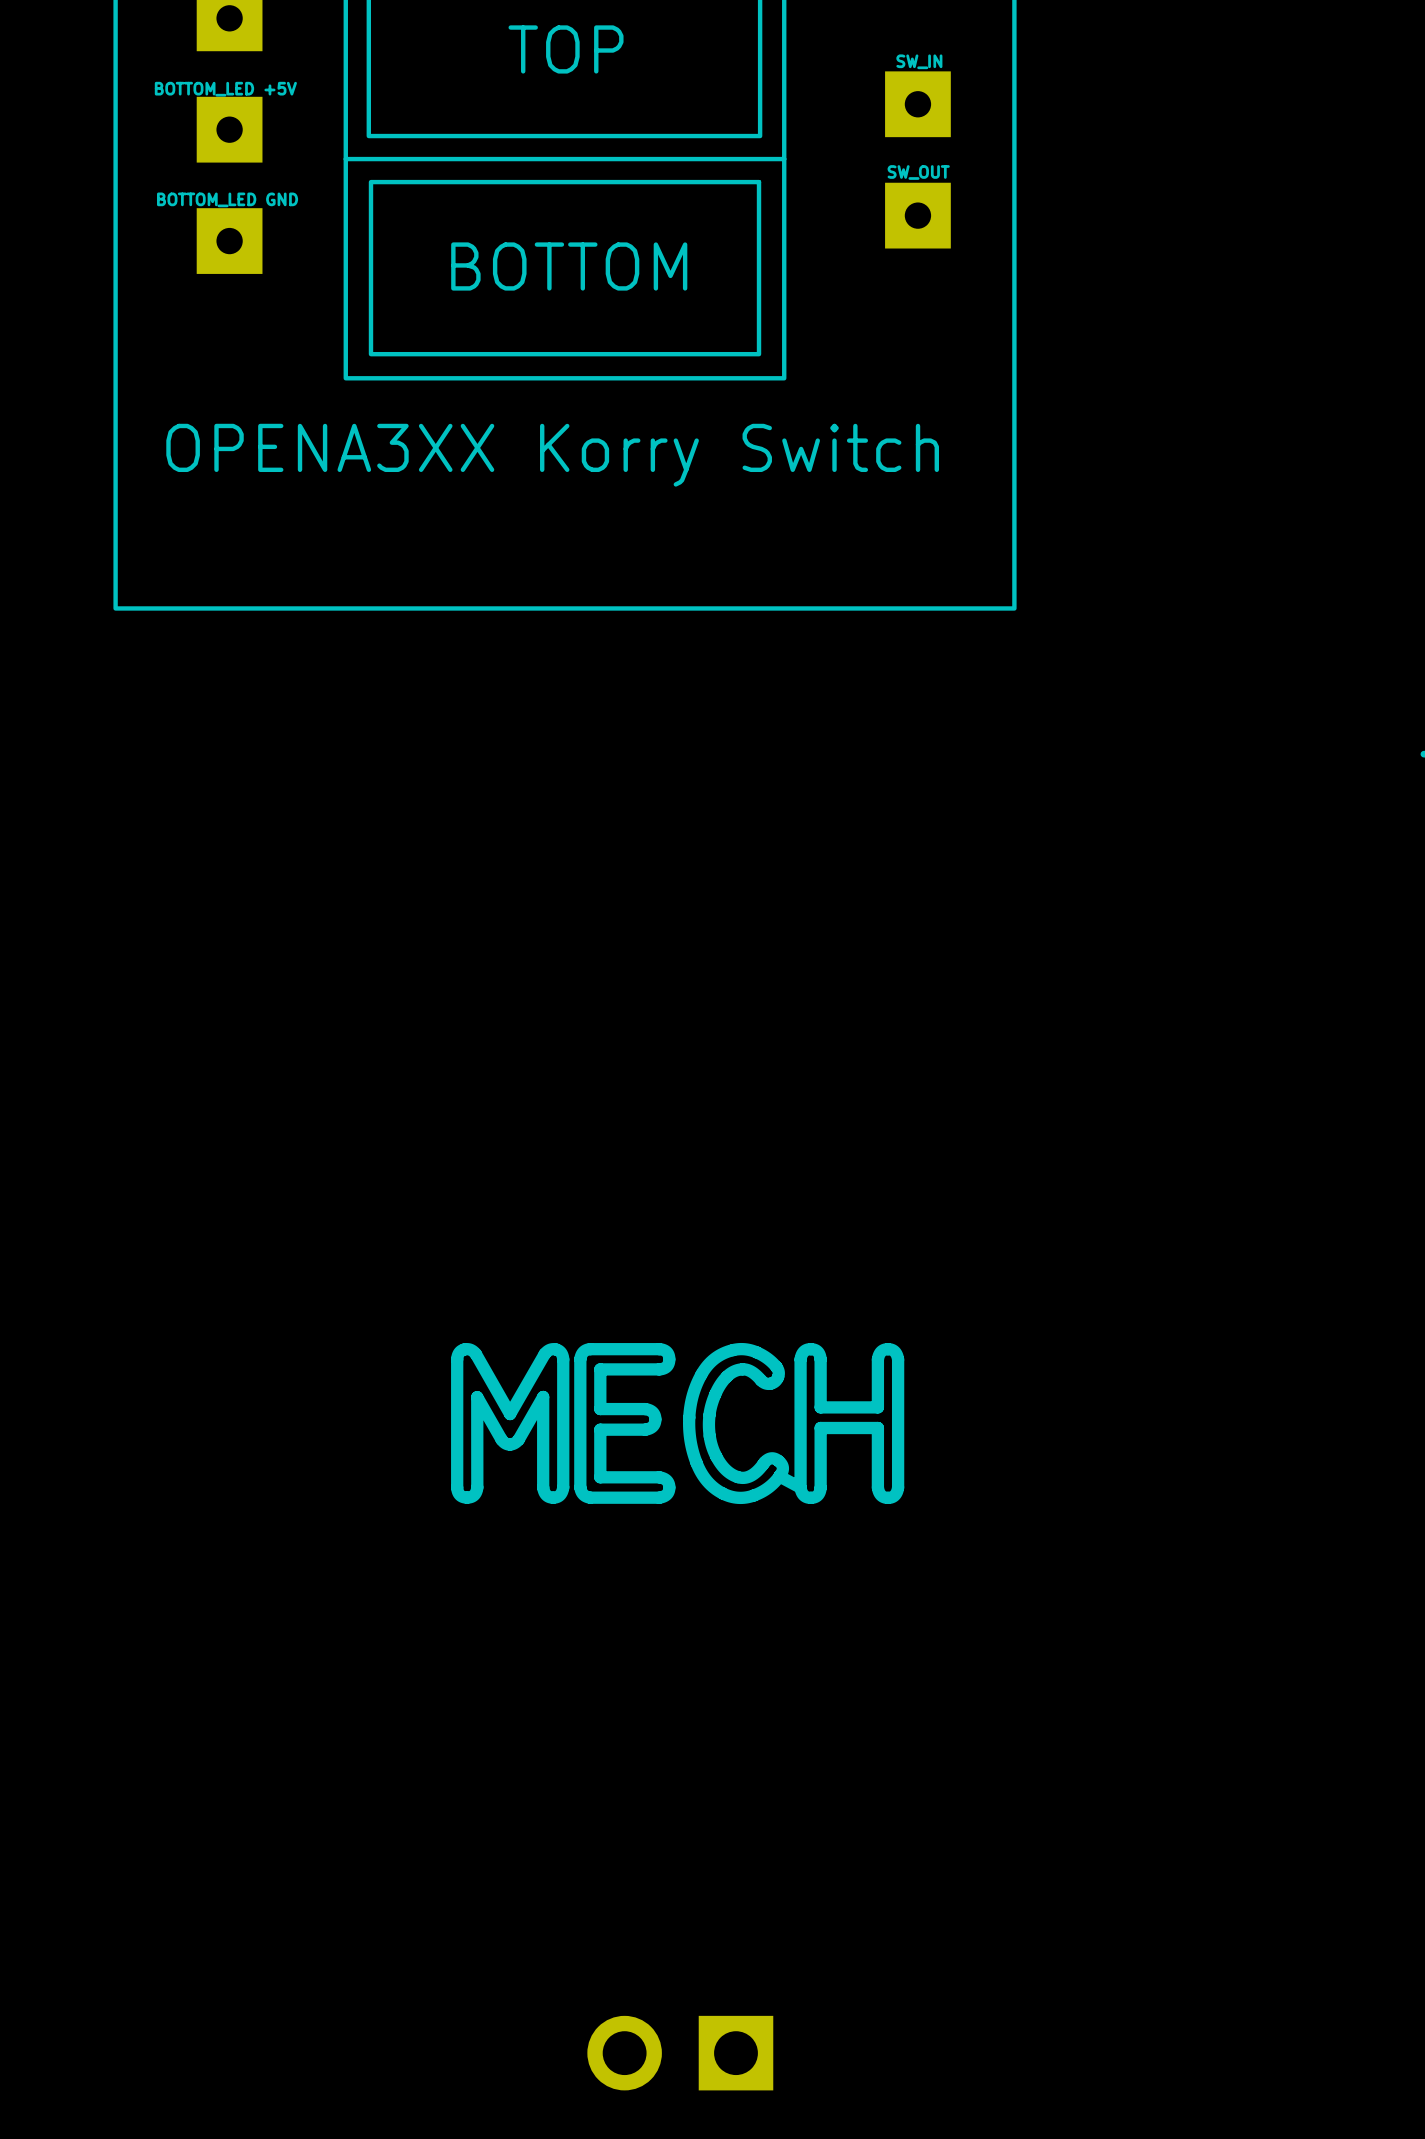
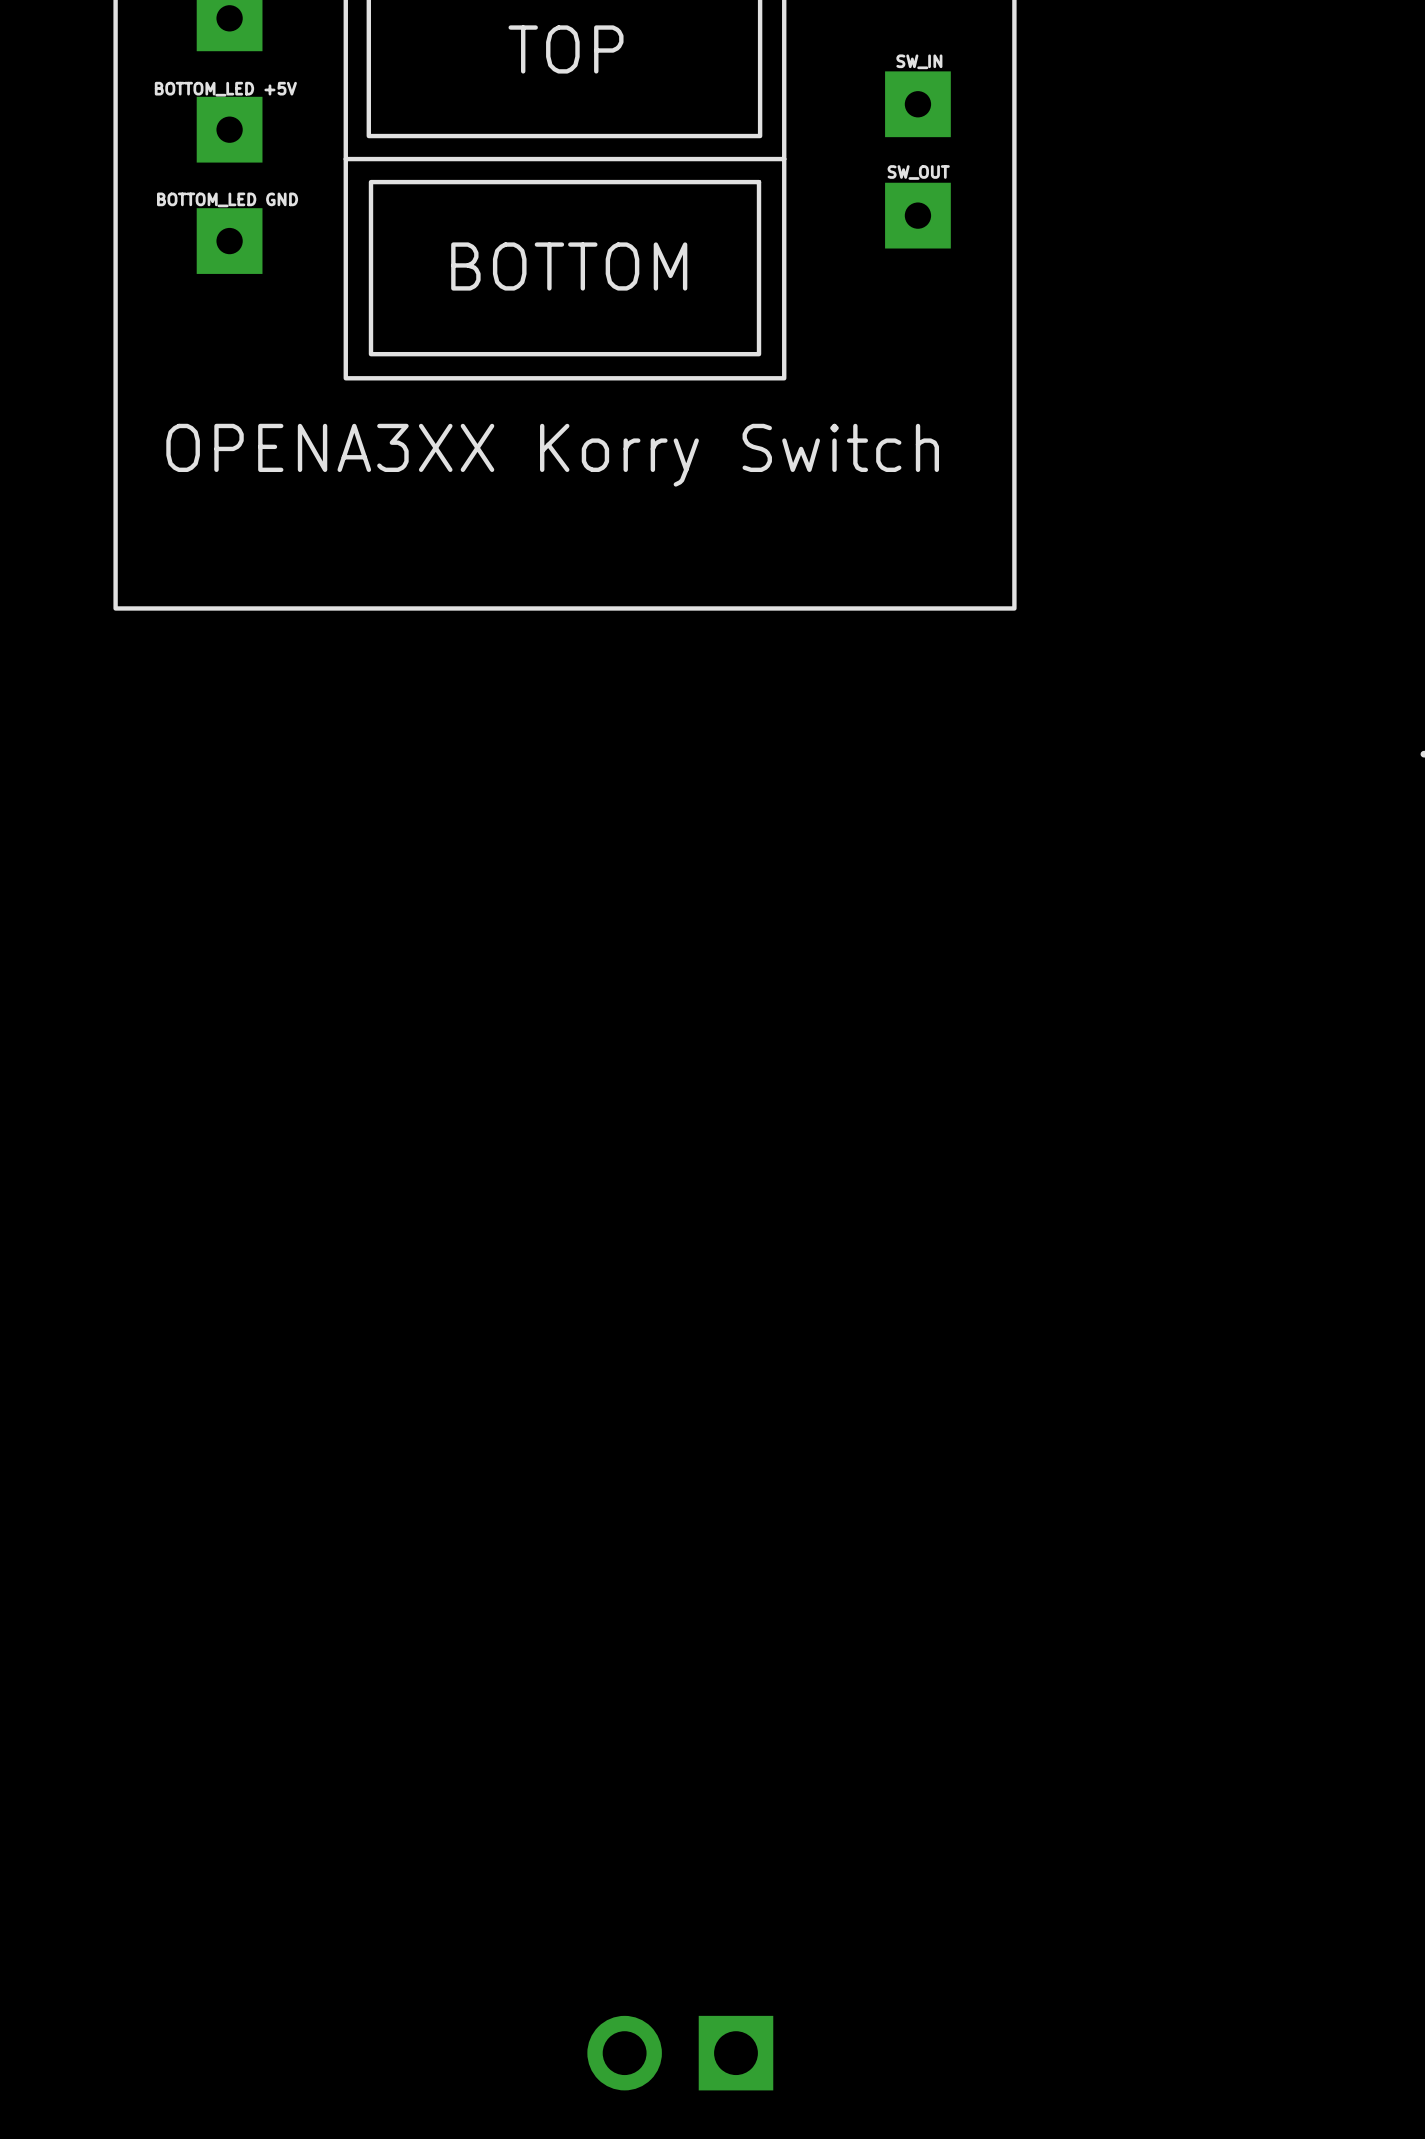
line: (556, 1349) (549, 1349) (544, 1354) (510, 1414) (475, 1353) (466, 1349) (458, 1353) (457, 1359) (457, 1487) (461, 1496) (471, 1496) (477, 1488) (477, 1397) (501, 1439) (509, 1444) (518, 1439) (543, 1396) (543, 1488) (545, 1494) (550, 1497) (557, 1497) (561, 1493) (563, 1487) (563, 1359) (561, 1352) (556, 1349) -> none
line: (659, 1349) (590, 1349) (581, 1354) (580, 1359) (580, 1487) (582, 1493) (586, 1496) (659, 1497) (668, 1492) (668, 1482) (660, 1477) (600, 1477) (600, 1429) (646, 1429) (653, 1425) (655, 1419) (653, 1413) (646, 1409) (600, 1409) (600, 1369) (663, 1368) (668, 1364) (668, 1356) (665, 1350) (659, 1349) -> none
line: (776, 1367) (762, 1355) (745, 1349) (728, 1351) (712, 1360) (701, 1374) (692, 1397) (689, 1420) (690, 1443) (696, 1462) (704, 1477) (714, 1488) (726, 1495) (740, 1497) (753, 1495) (768, 1487) (779, 1476) (800, 1487) -> none
line: (776, 1367) (777, 1377) (769, 1383) (763, 1382) (753, 1373) (745, 1369) (737, 1370) (728, 1375) (720, 1384) (713, 1398) (708, 1426) (714, 1452) (721, 1465) (730, 1473) (739, 1477) (748, 1476) (756, 1471) (766, 1460) (772, 1458) (777, 1460) (782, 1465) (780, 1475) -> none
line: (800, 1487) (800, 1359) (802, 1353) (812, 1349) (819, 1355) (820, 1407) (877, 1407) (878, 1357) (884, 1349) (893, 1350) (898, 1359) (898, 1487) (895, 1493) (891, 1497) (885, 1497) (878, 1490) (877, 1428) (820, 1428) (819, 1492) (815, 1496) (807, 1497) (802, 1493) (800, 1487) -> none

